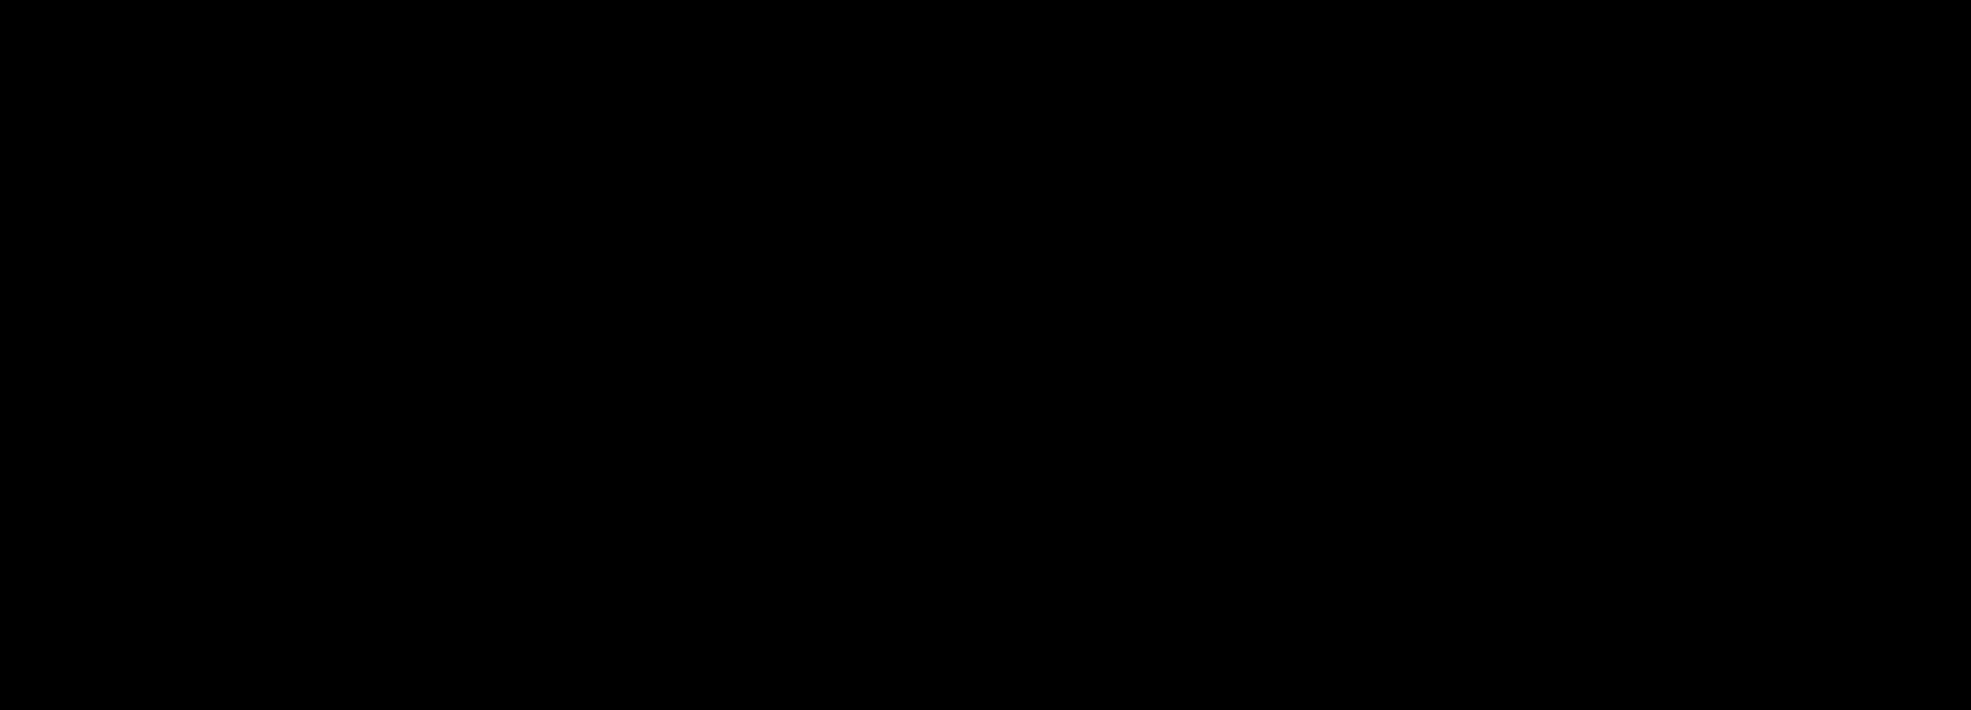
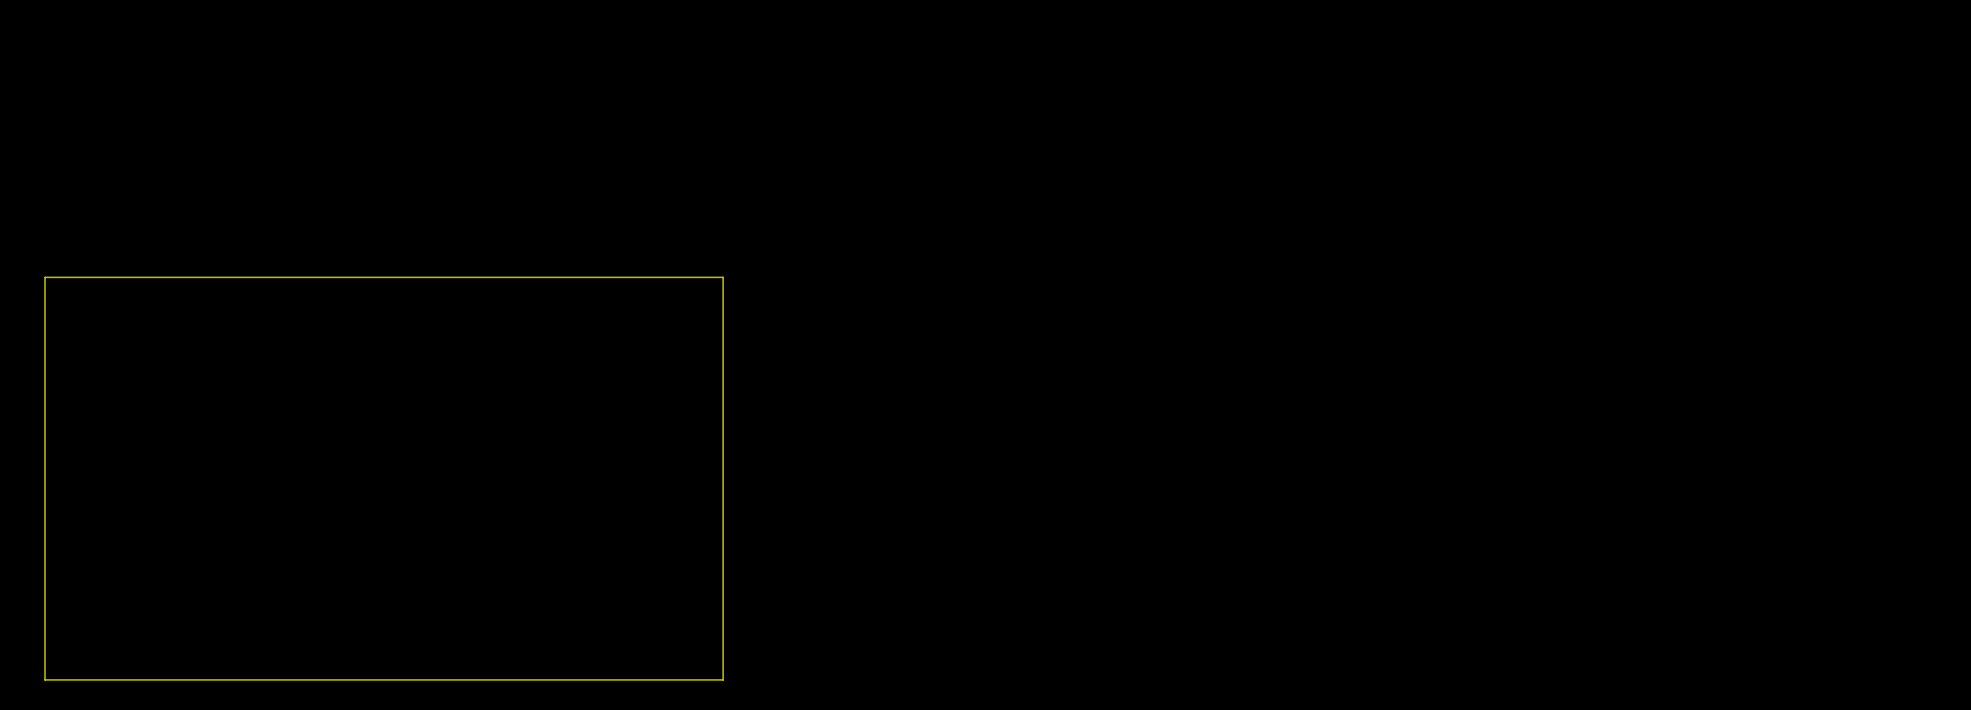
board edge: none -> (45, 277) (723, 277) (723, 679) (45, 679) (45, 277)

